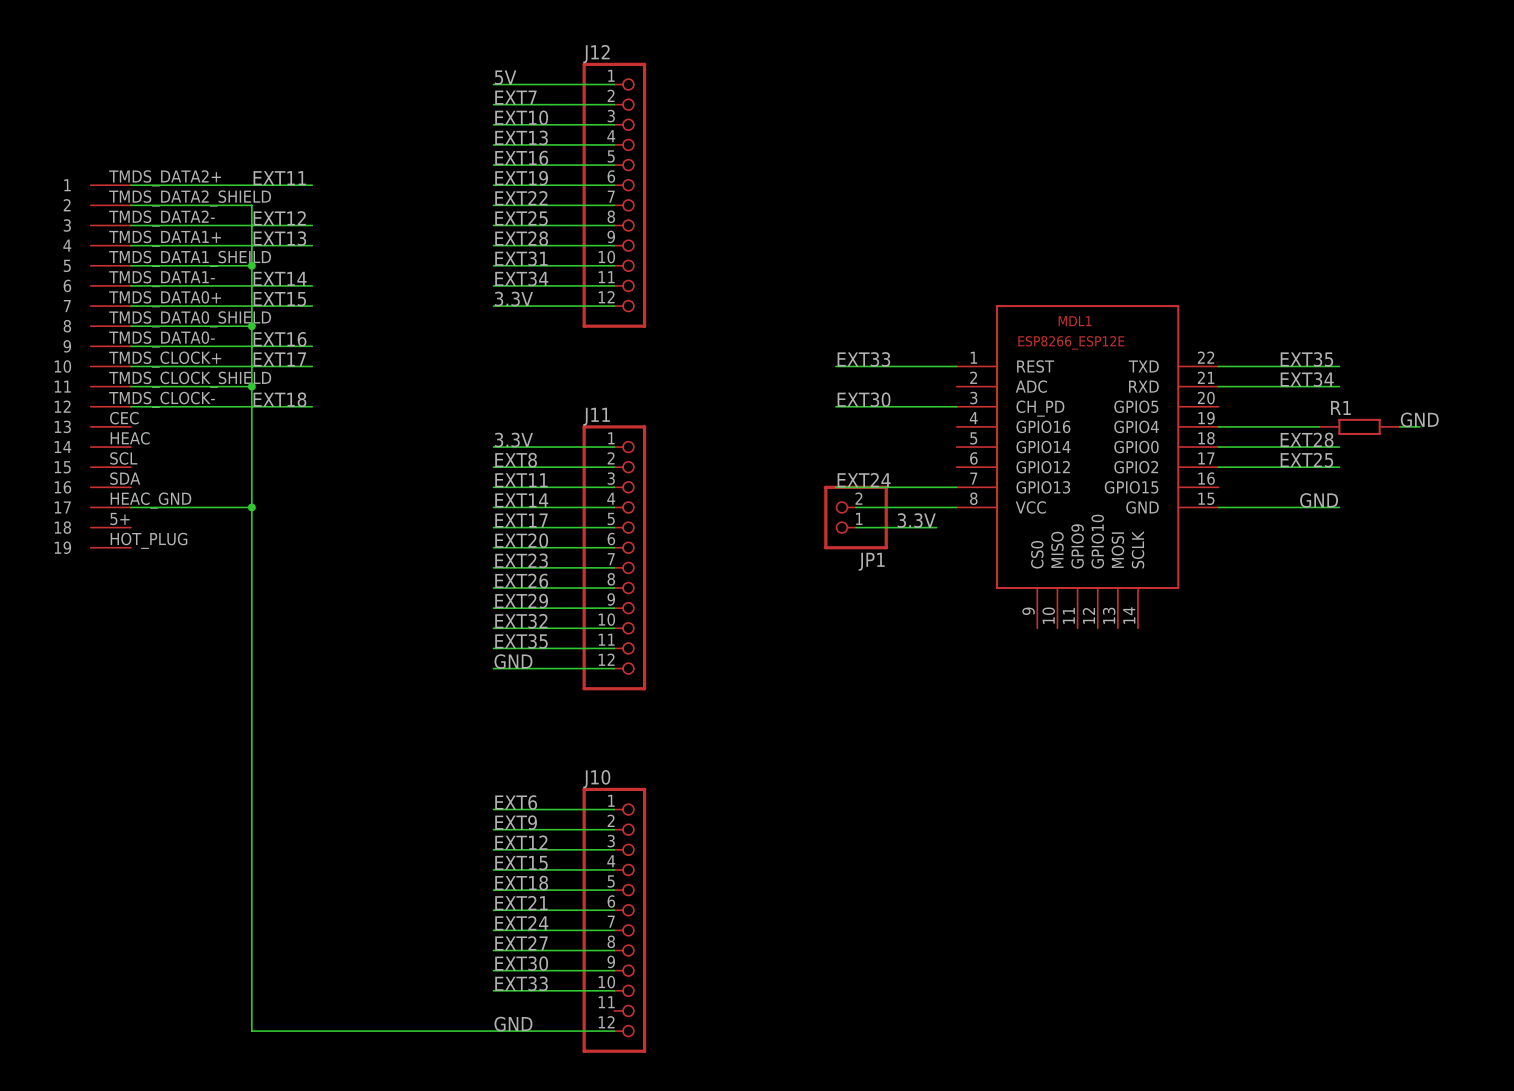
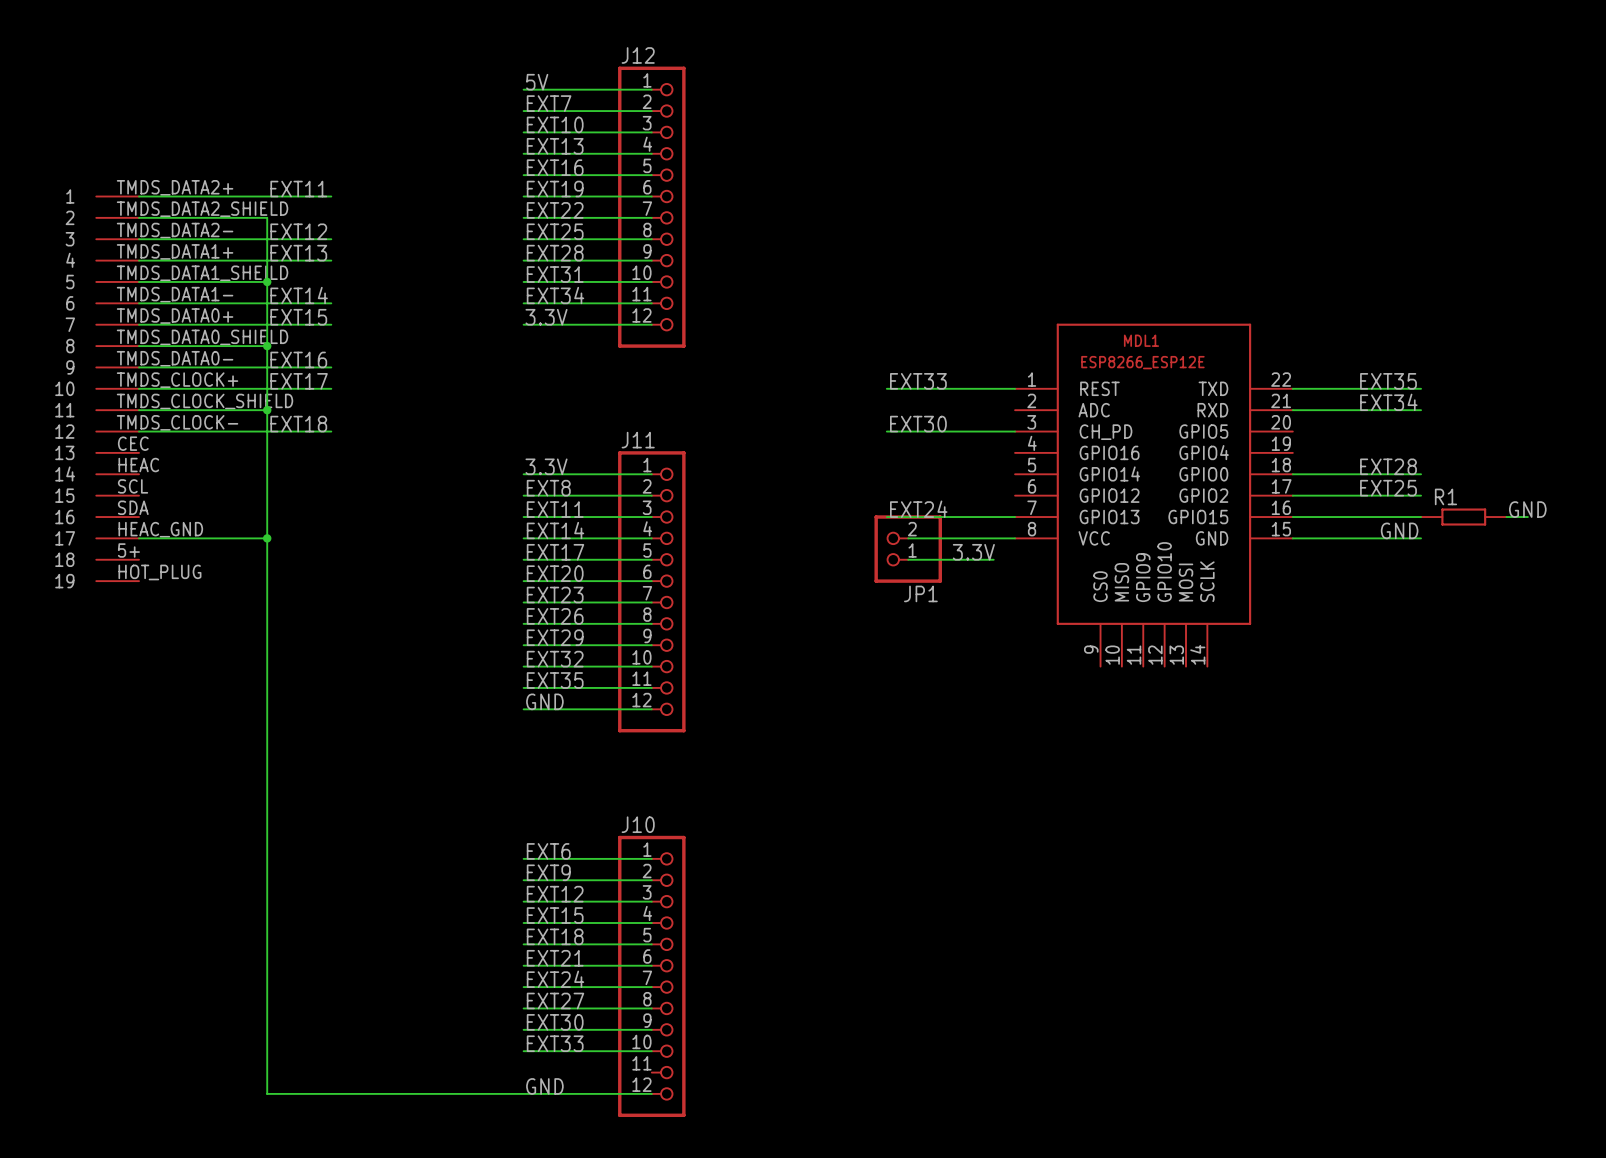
label position: GND (1419, 419) -> GND (1527, 509)
wire: (1218, 426) (1319, 426) -> none
R1 position: (1359, 426) -> (1463, 517)
wire: (1399, 426) (1419, 426) -> (1506, 517) (1527, 517)
wire: none -> (1292, 517) (1421, 517)

